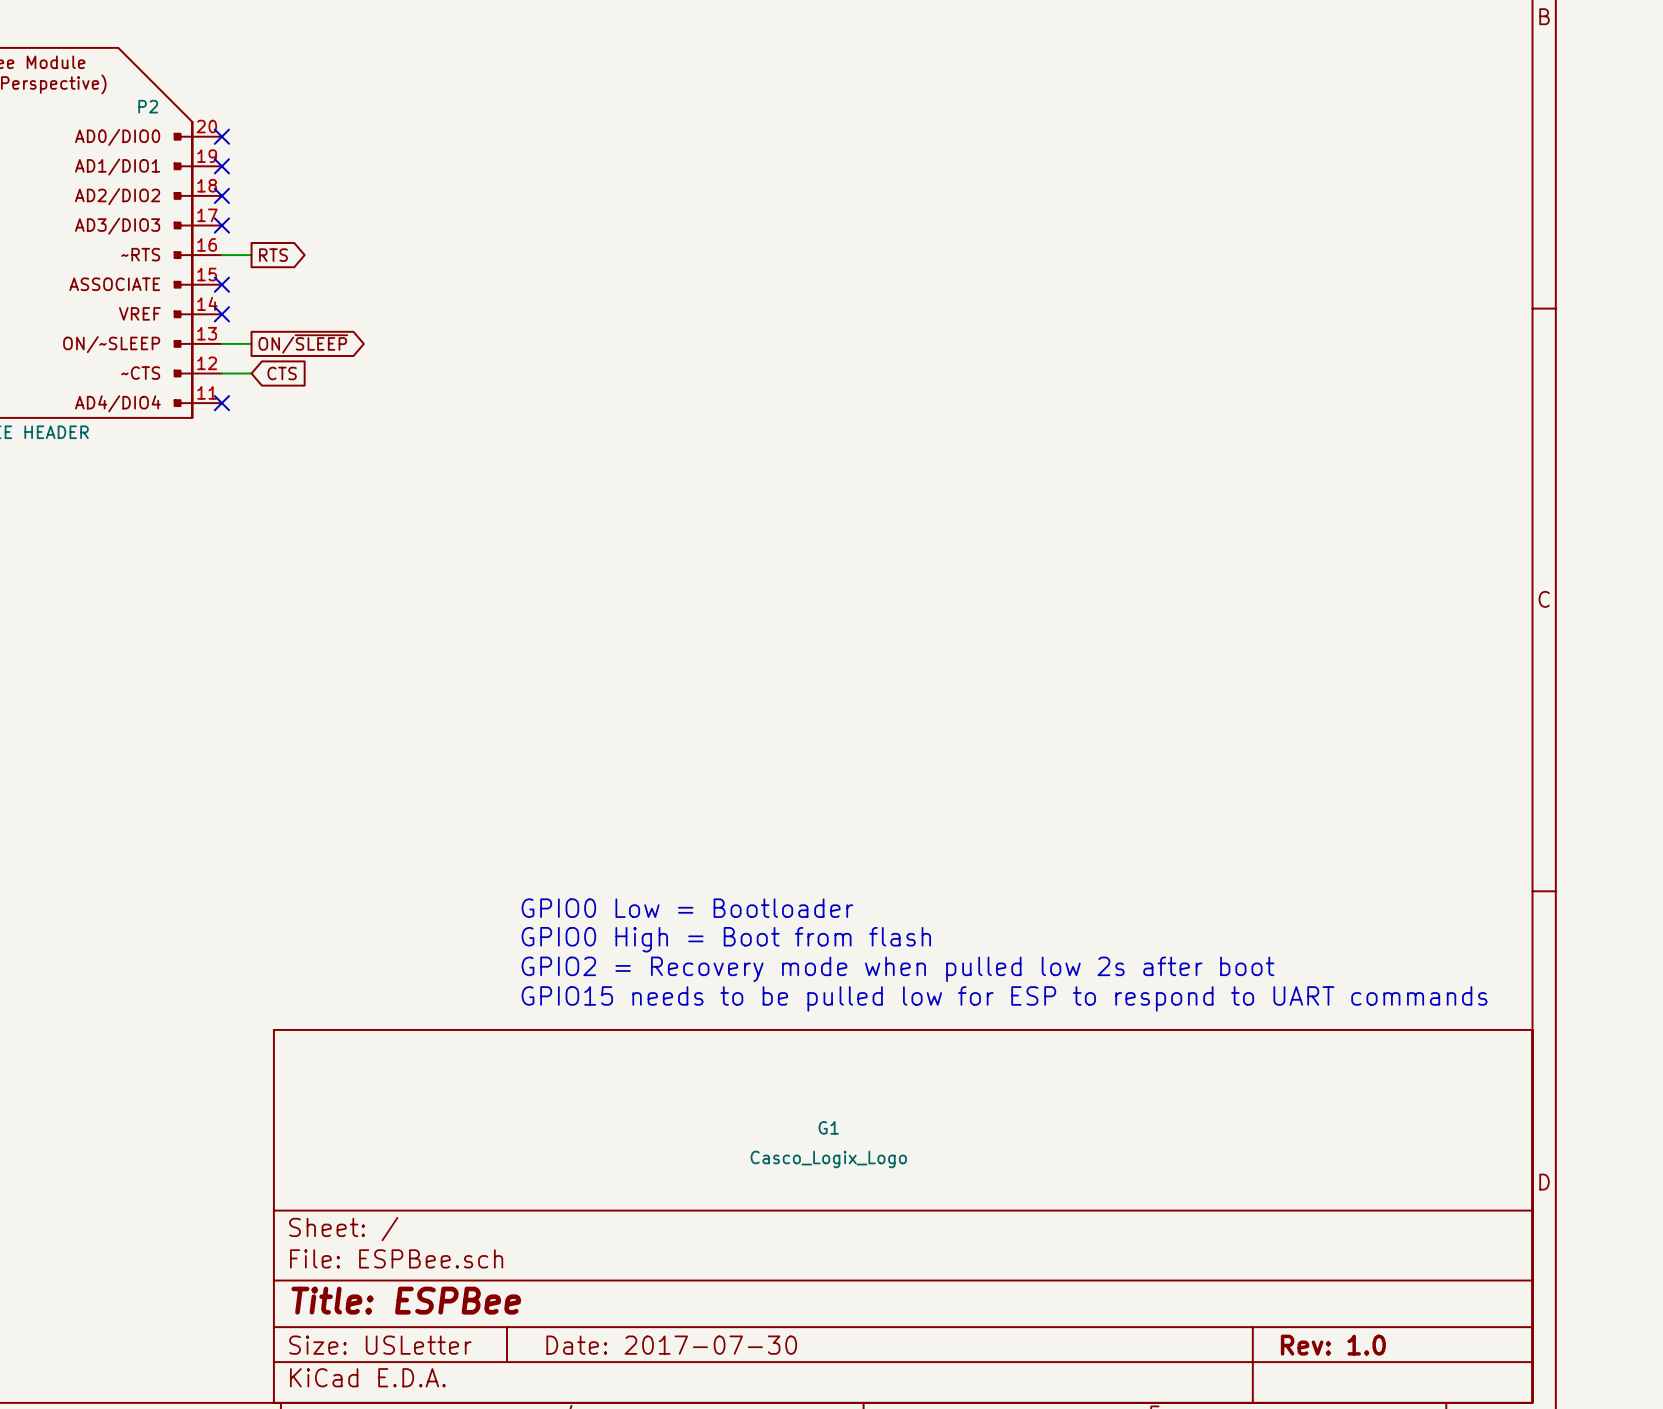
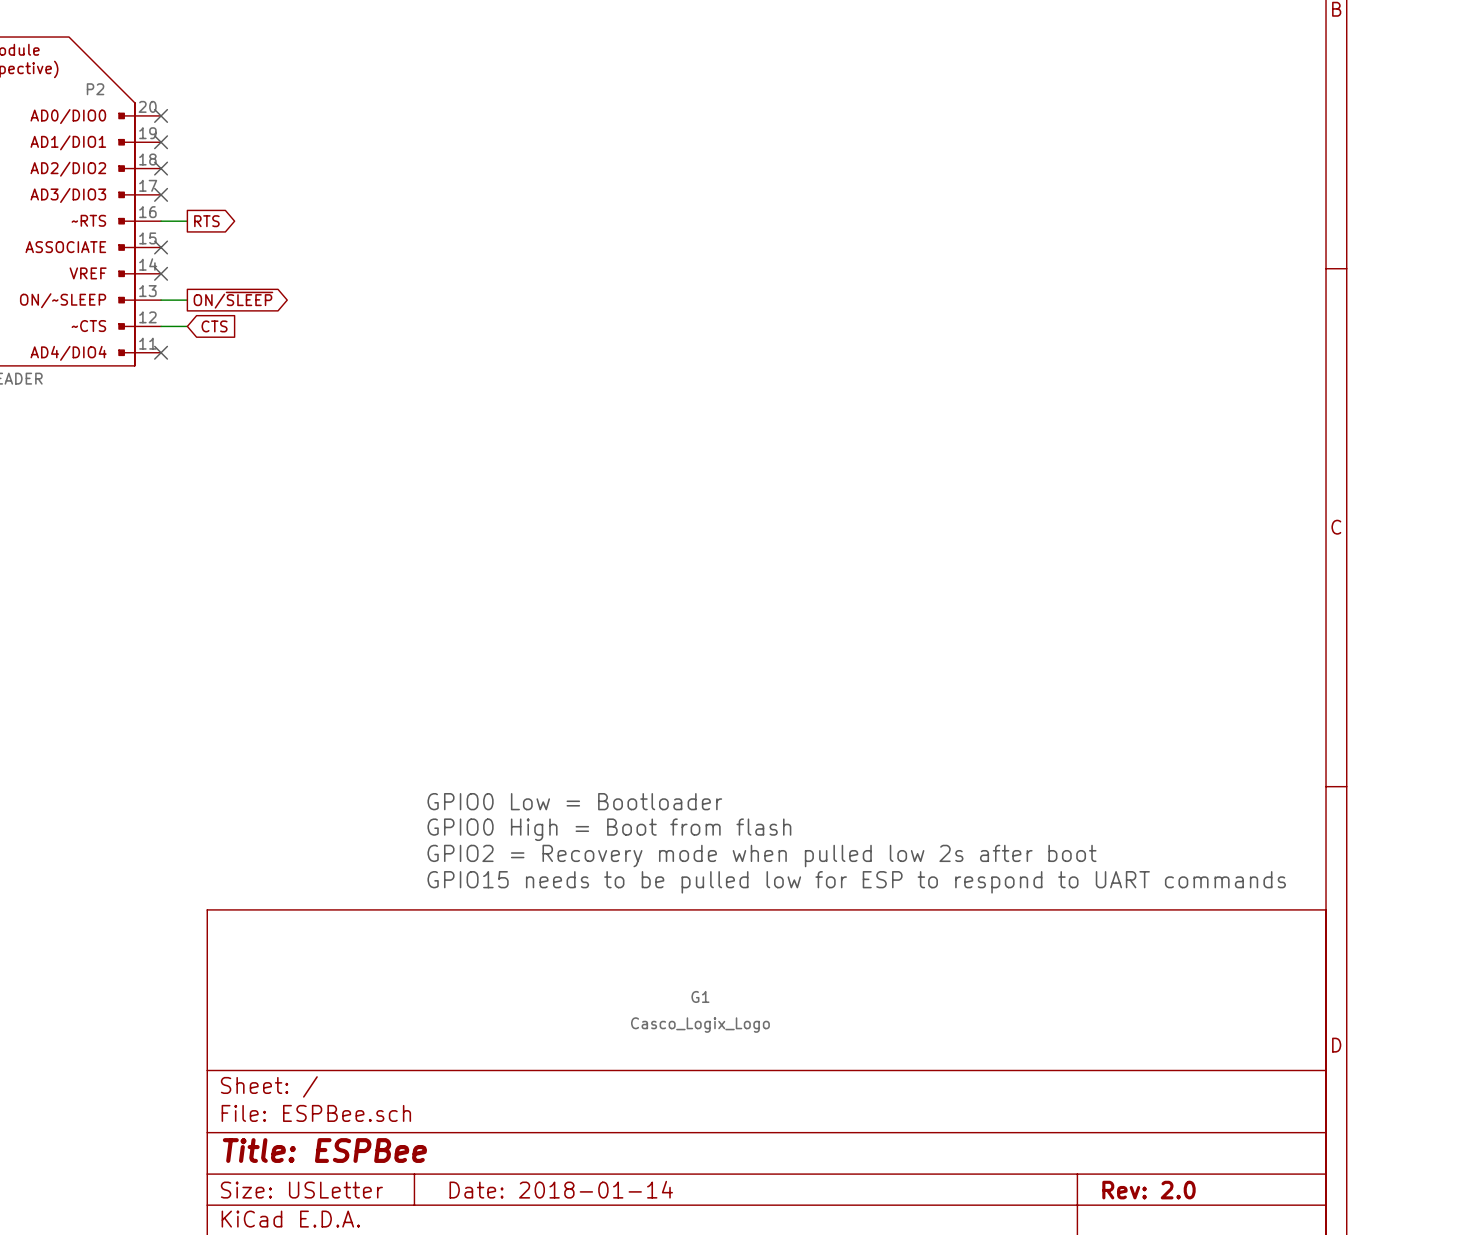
title block: Date: 2017-07-30 (671, 1345) -> Date: 2018-01-14 (561, 1189)
title block: Rev: 1.0 (1333, 1345) -> Rev: 2.0 (1148, 1190)

